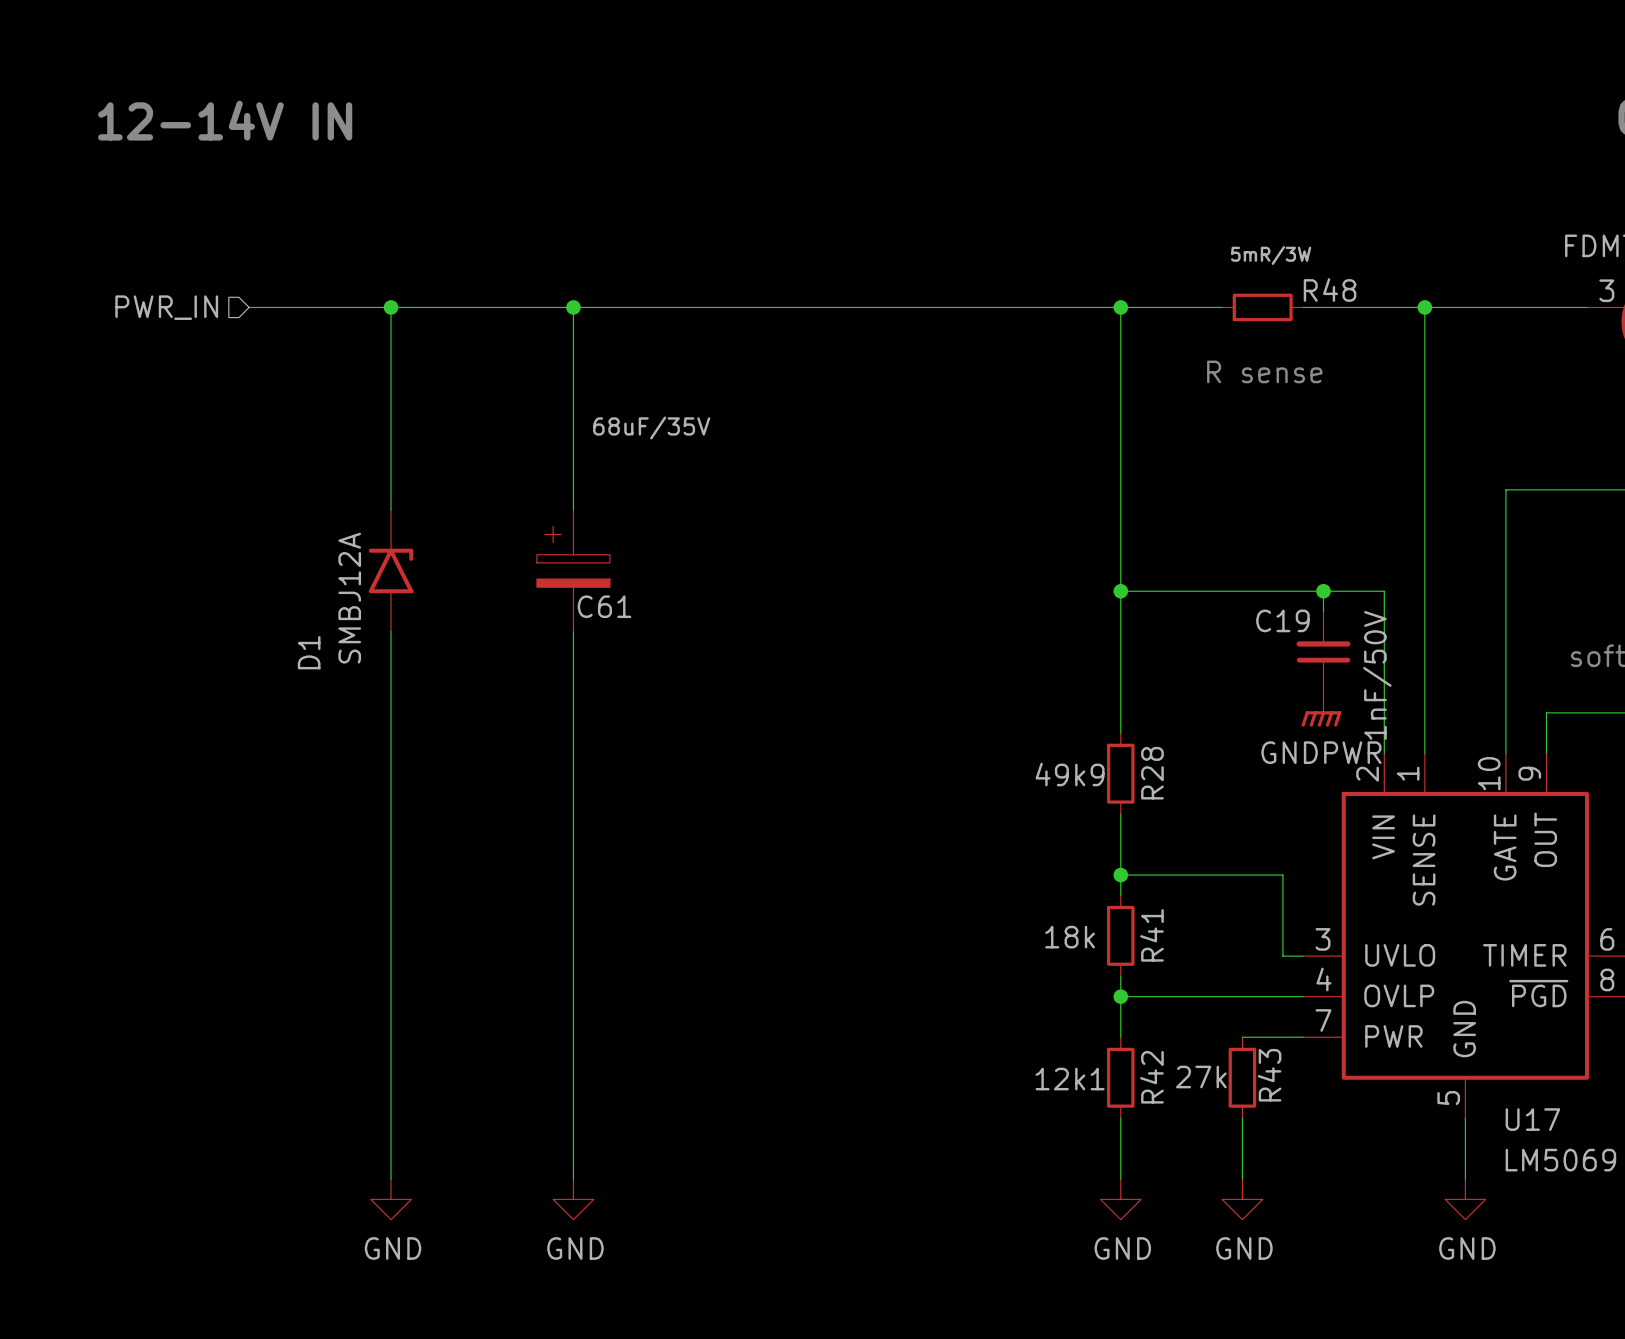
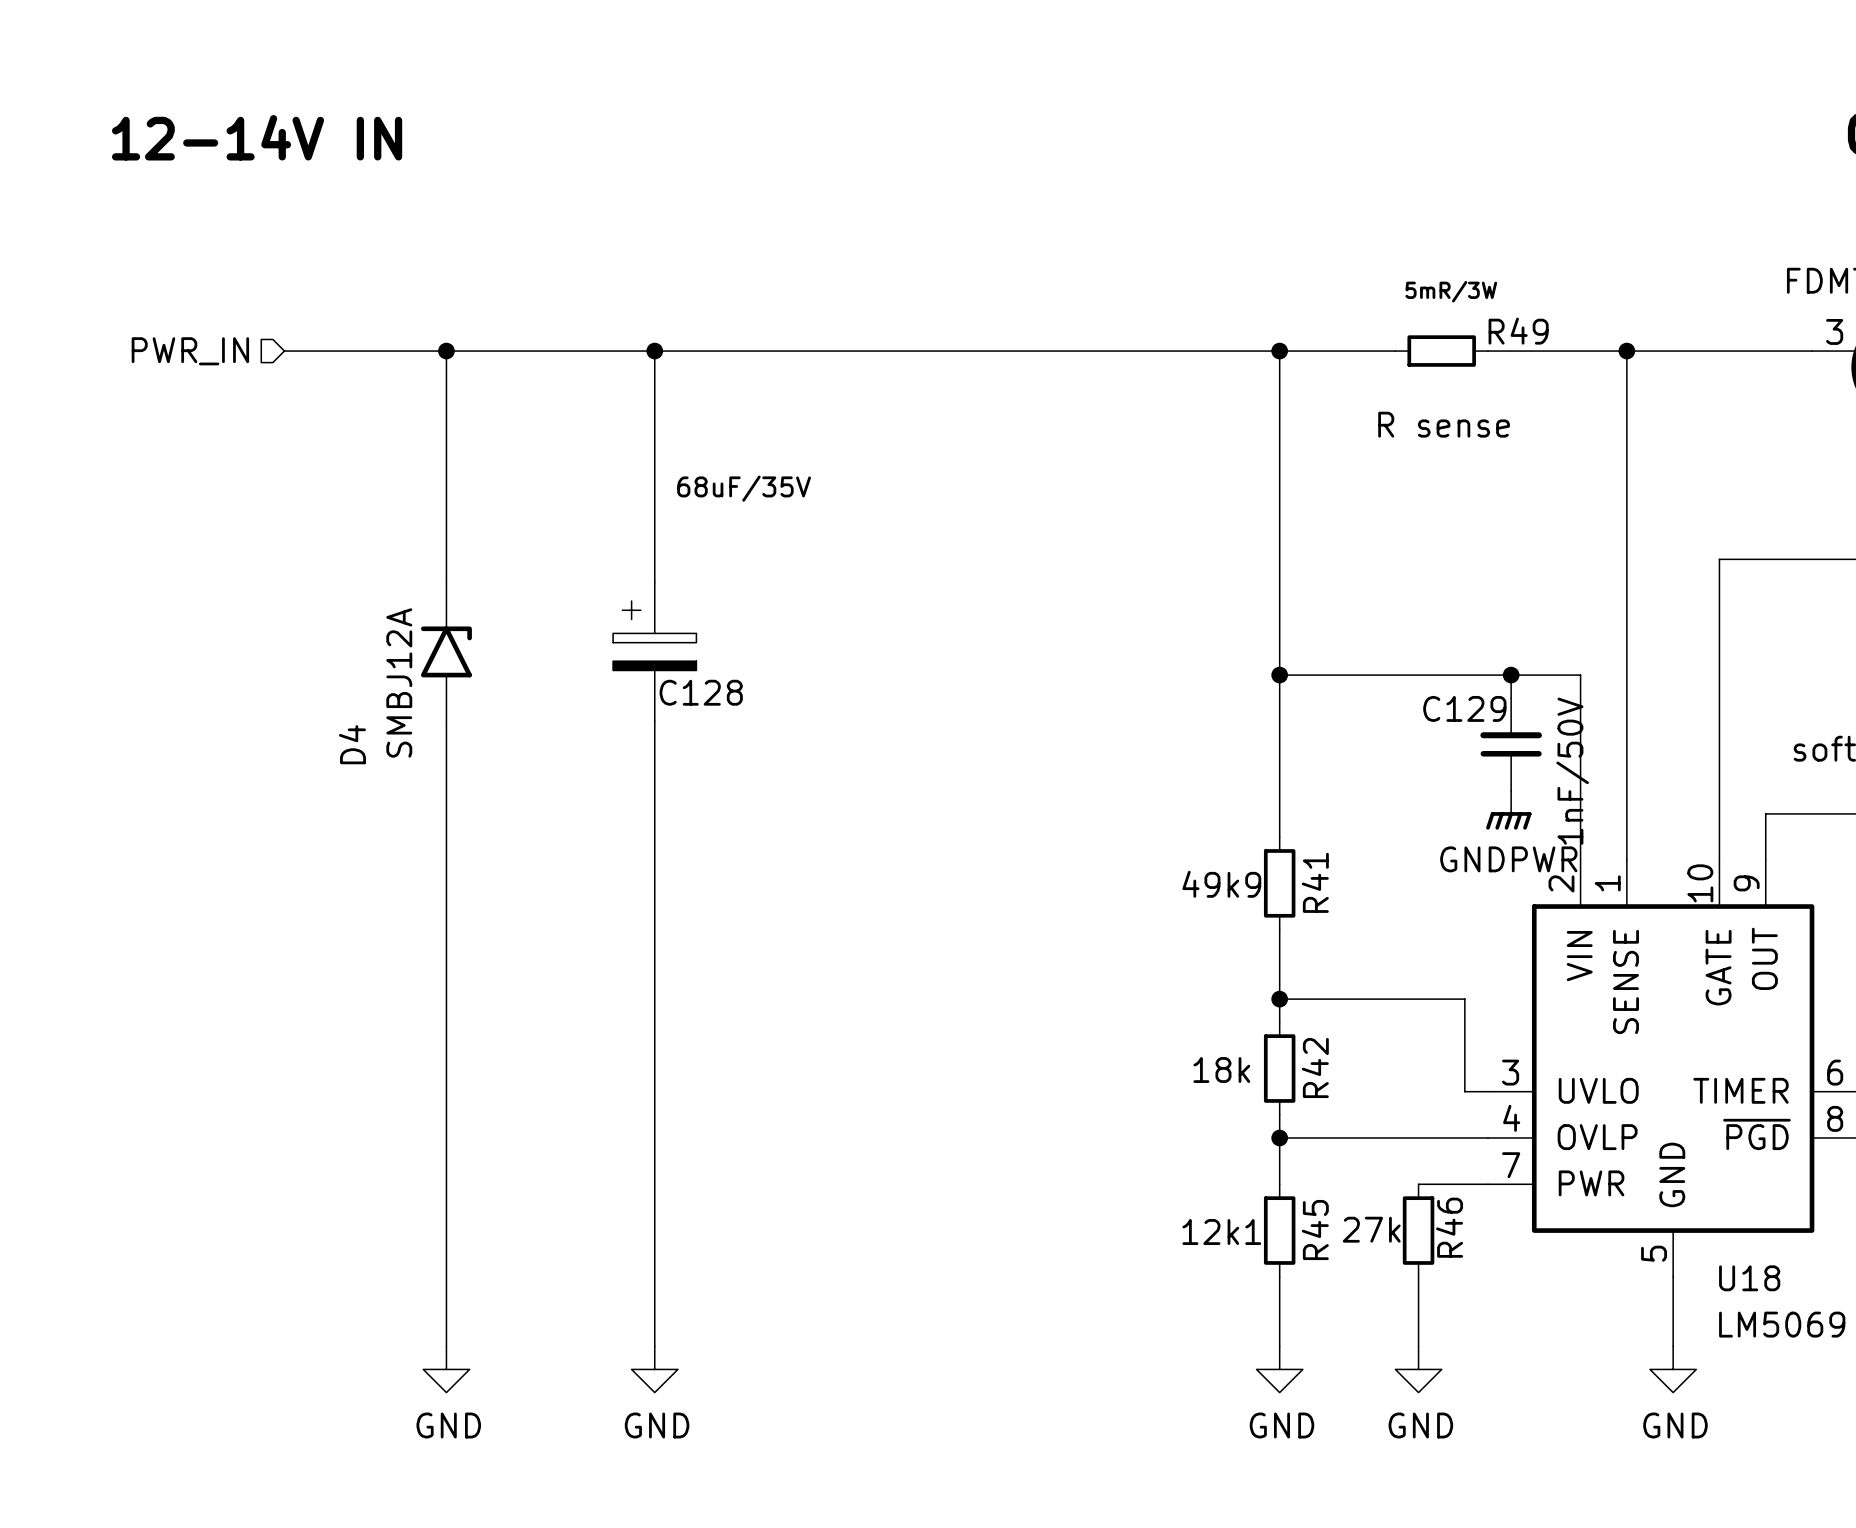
R48 name: R48 (1330, 289) -> R49 (1518, 331)
C61 name: C61 (604, 606) -> C128 (701, 692)
C19 name: C19 (1282, 620) -> C129 (1464, 708)
D1 name: D1 (309, 652) -> D4 (352, 744)
R28 name: R28 (1152, 773) -> R41 (1315, 882)
R41 name: R41 (1151, 935) -> R42 (1315, 1067)
R43 name: R43 (1269, 1075) -> R46 (1449, 1227)
R42 name: R42 (1151, 1077) -> R45 (1315, 1230)
U17 name: U17 (1532, 1119) -> U18 (1749, 1278)

